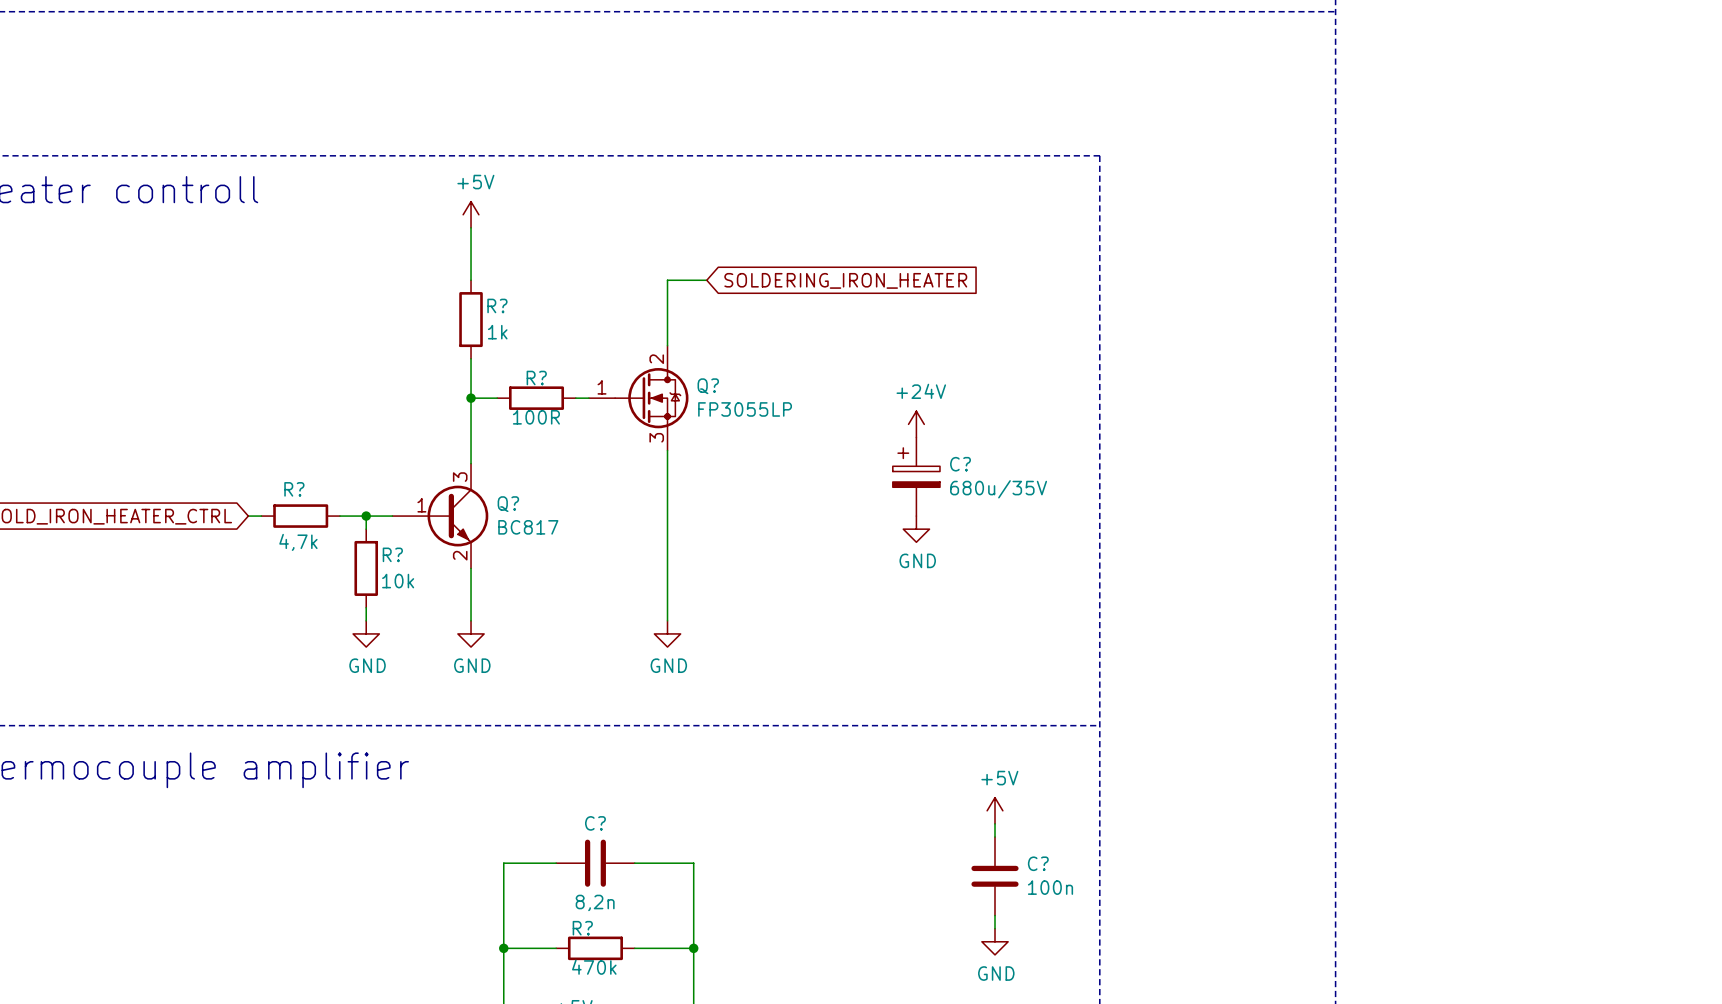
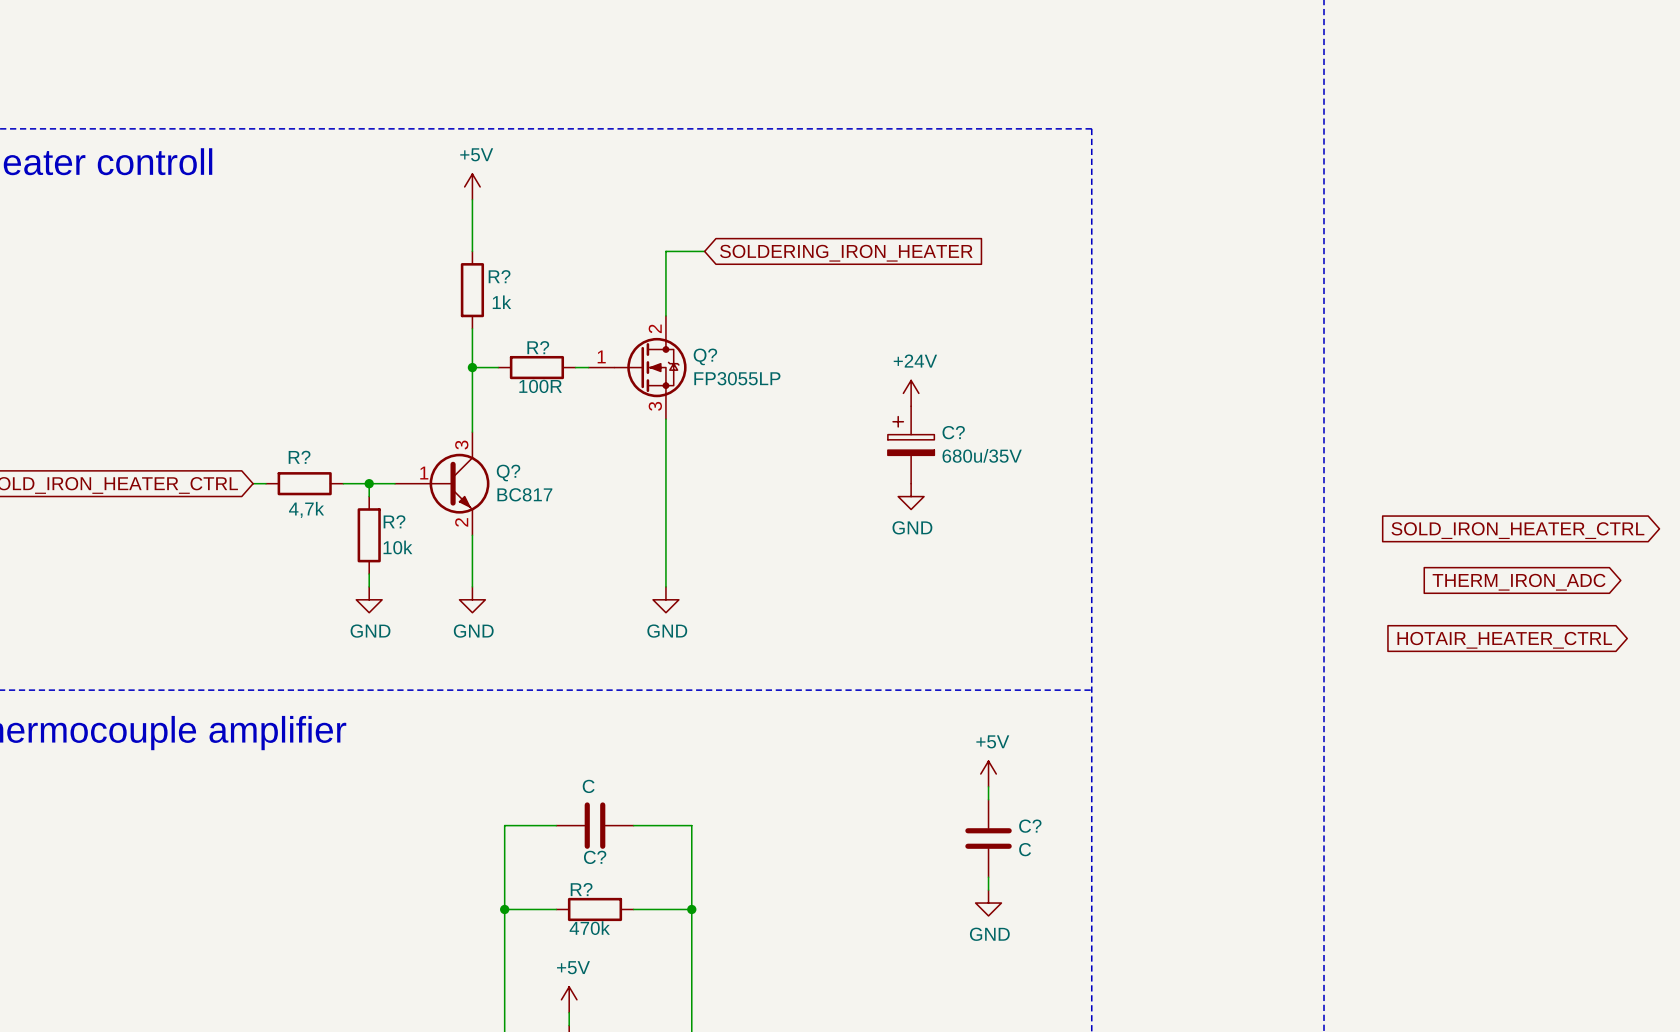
global label: none -> SOLD_IRON_HEATER_CTRL (1517, 530)
global label: none -> THERM_IRON_ADC (1519, 582)
global label: none -> HOTAIR_HEATER_CTRL (1504, 640)
C? name position: C? (595, 823) -> C? (595, 857)
C? value: 100n (1050, 887) -> C (1025, 849)
C? value: 8,2n (595, 902) -> C (588, 786)

